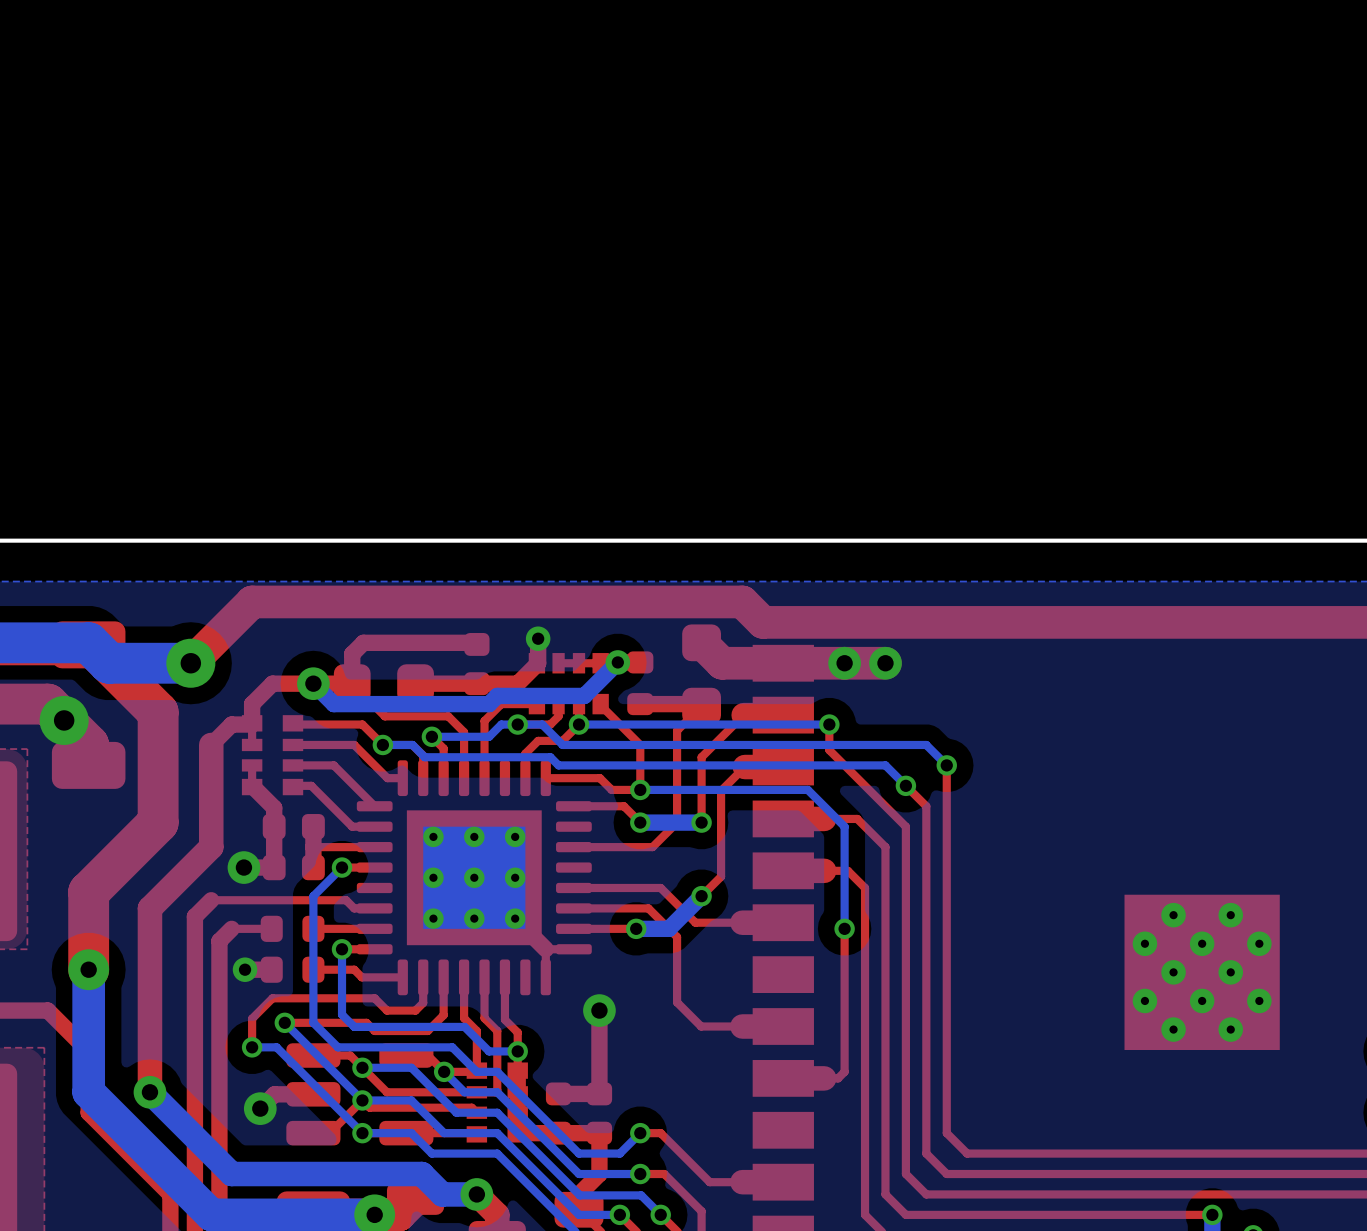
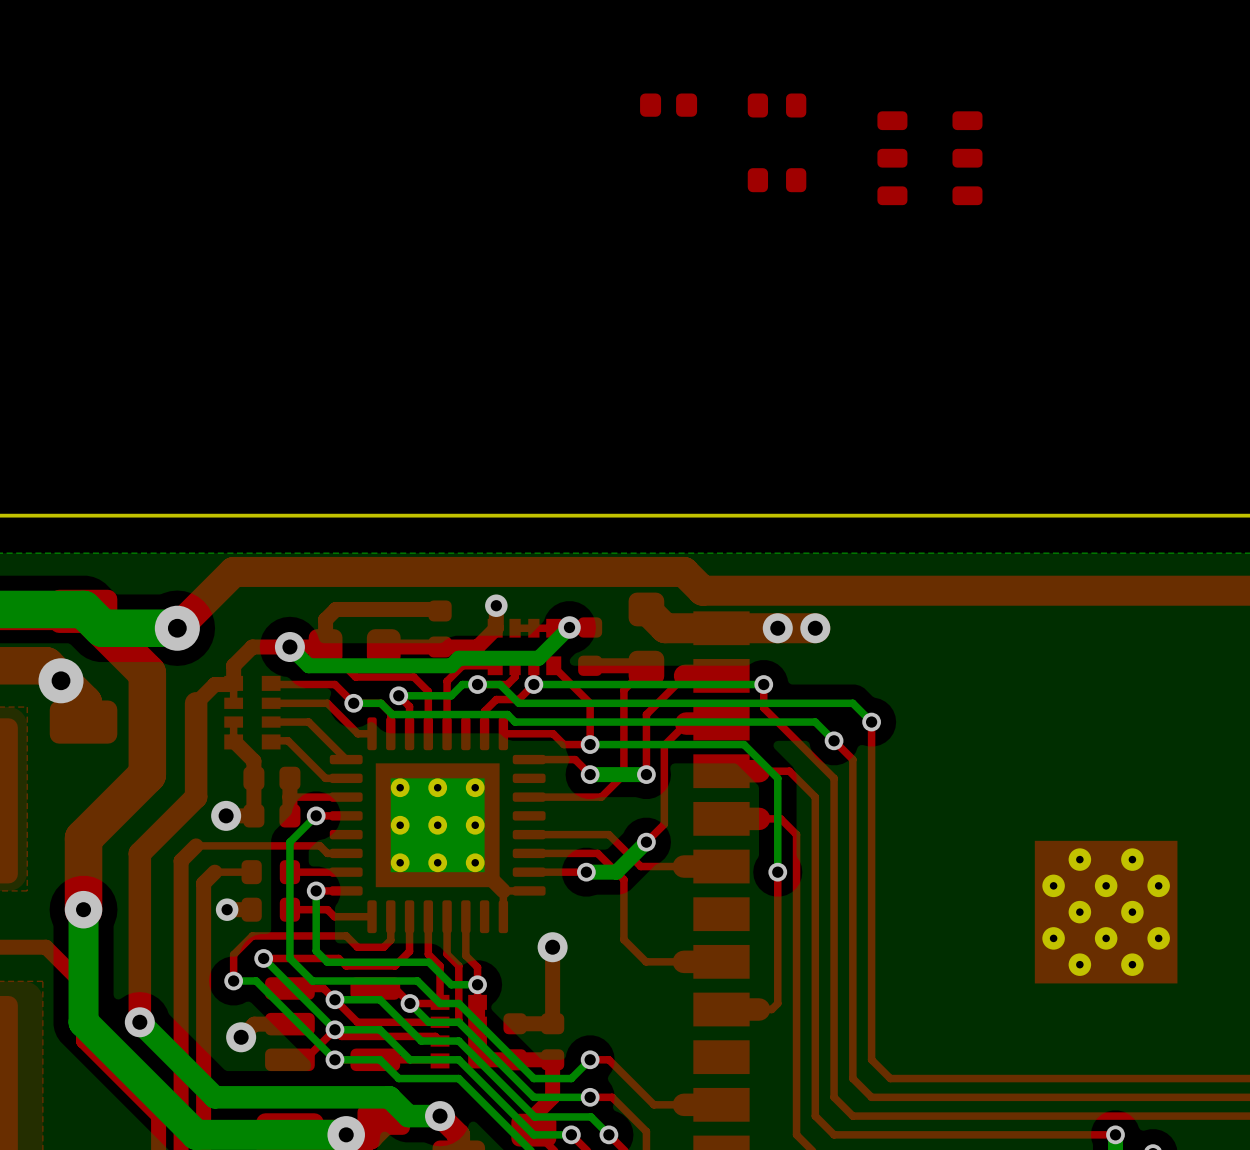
part: none -> (668, 105)
part: none -> (777, 105)
part: none -> (929, 158)
part: none -> (777, 180)

